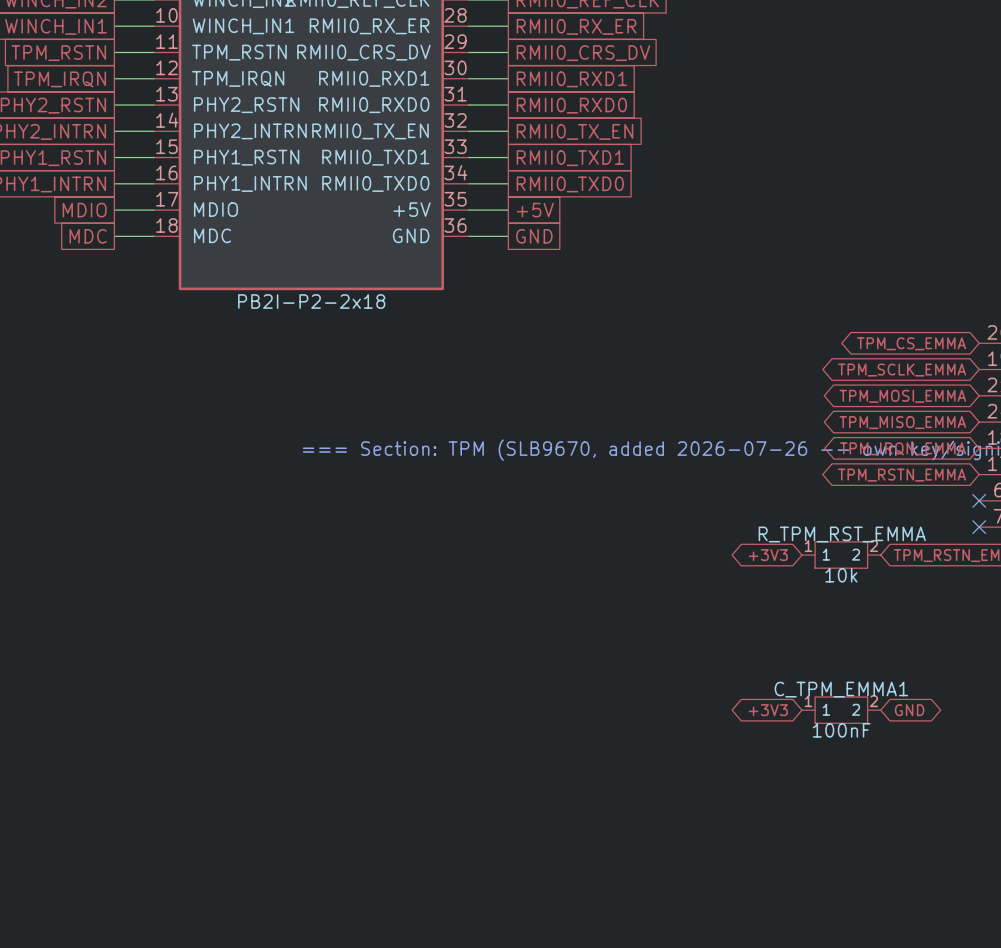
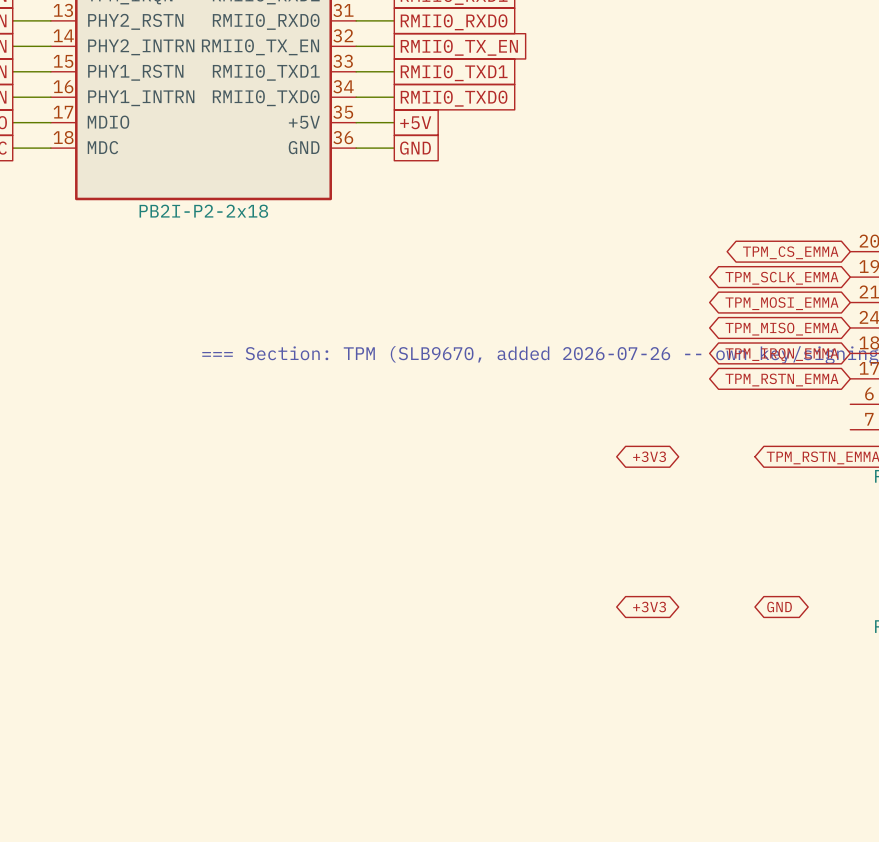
no-connect mark: (979, 500) -> none
no-connect mark: (979, 527) -> none
R_TPM_RST_EMMA: 10k (841, 555) -> none
C_TPM_EMMA1: 100nF (841, 710) -> none

